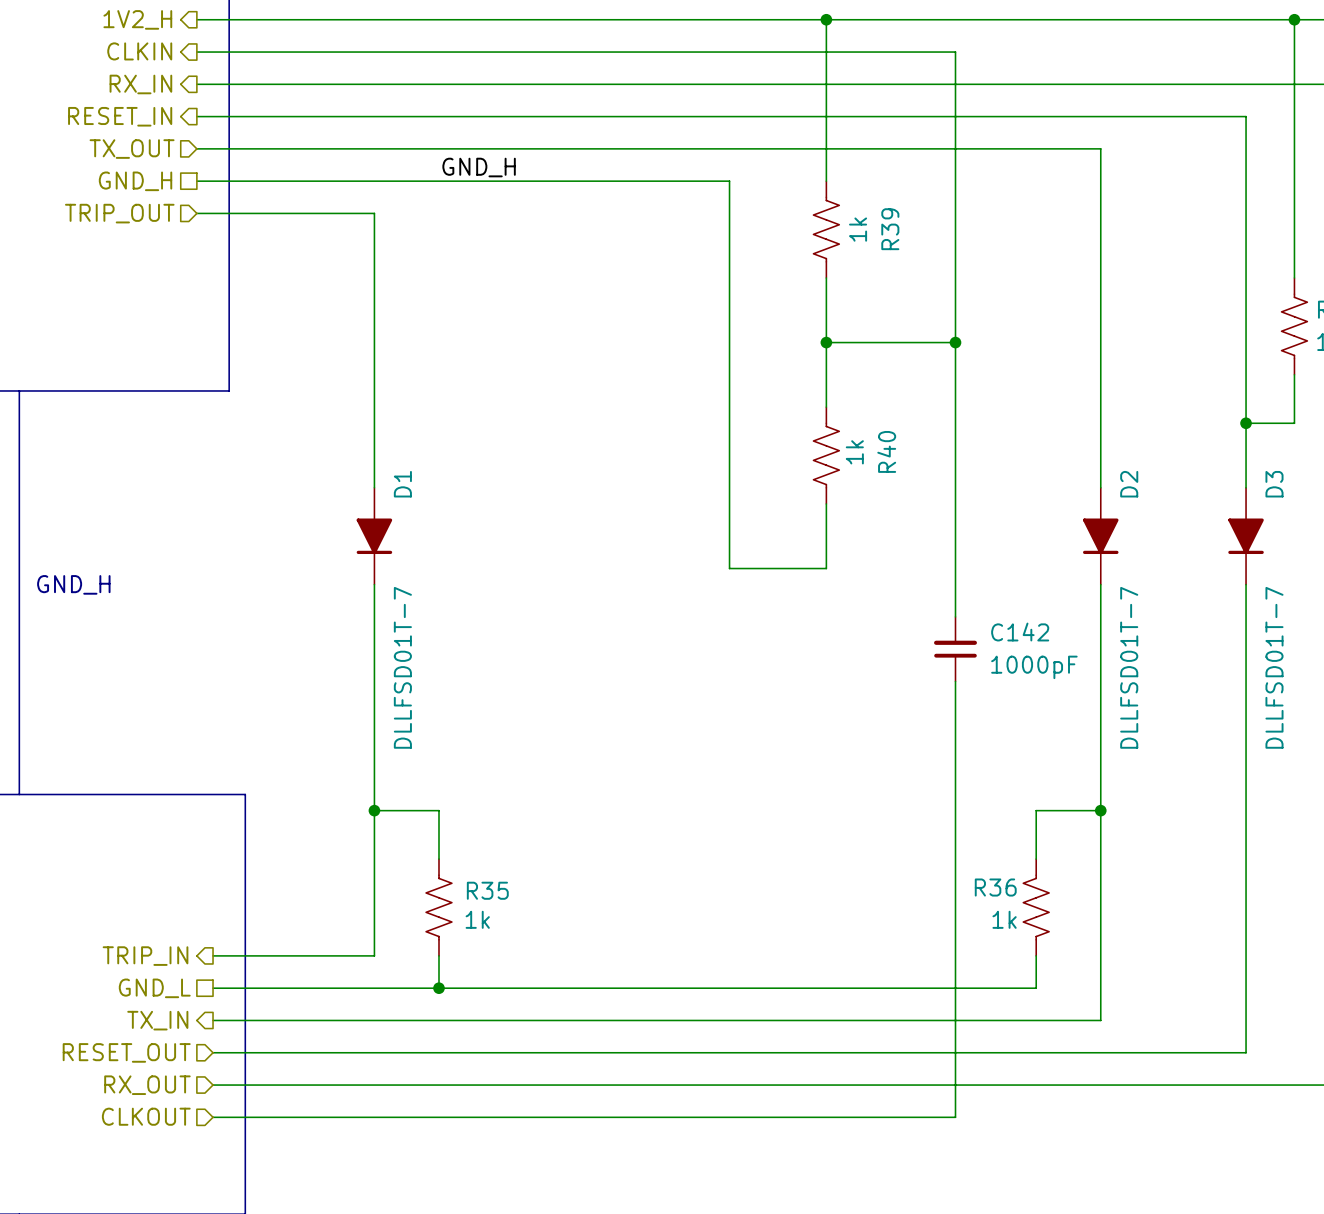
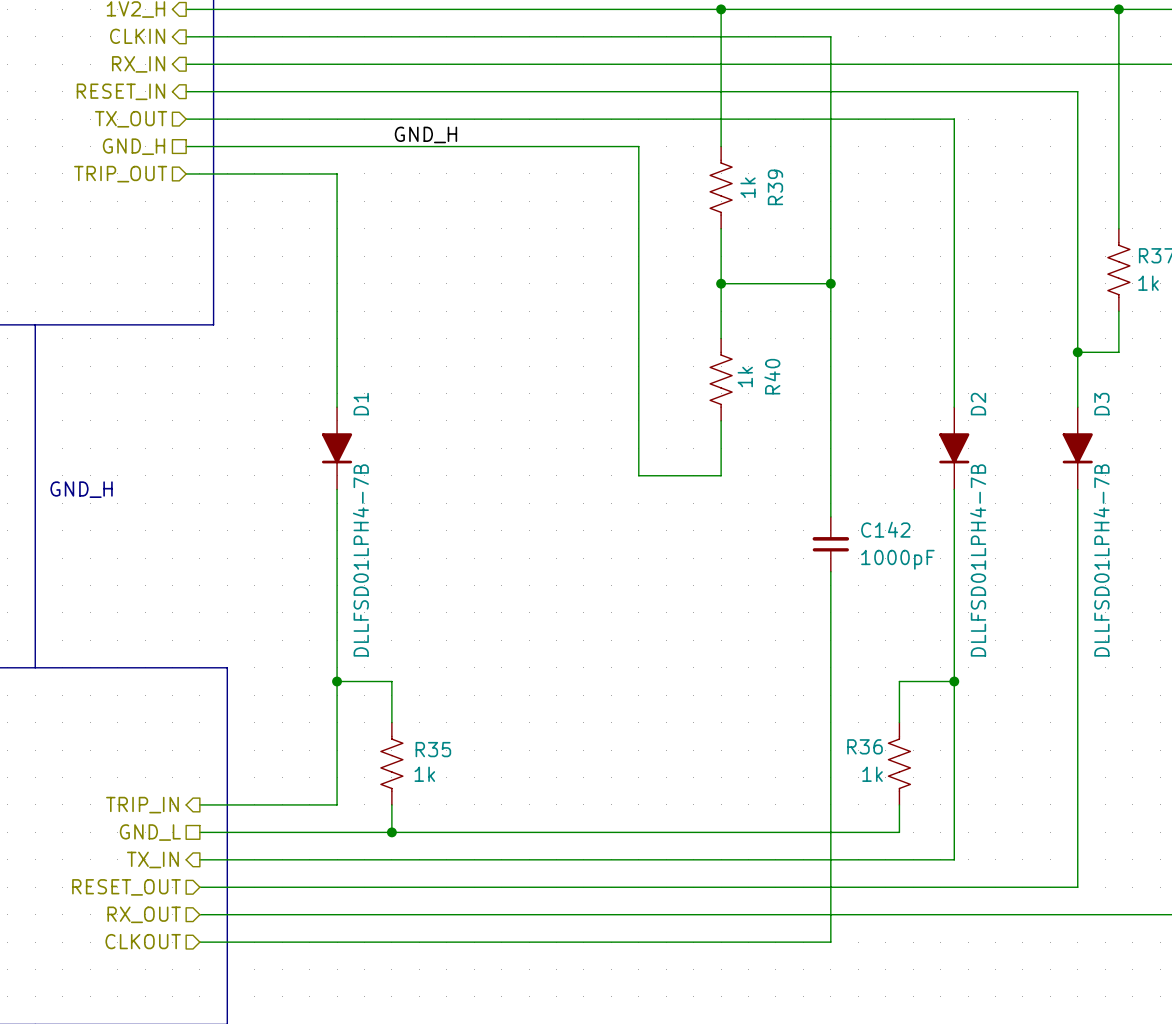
D1 value: DLLFSD01T-7 (402, 667) -> DLLFSD01LPH4-7B (360, 560)
D2 value: DLLFSD01T-7 (1129, 667) -> DLLFSD01LPH4-7B (978, 560)
D3 value: DLLFSD01T-7 (1274, 667) -> DLLFSD01LPH4-7B (1101, 560)

